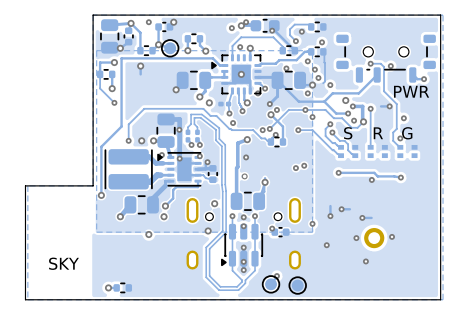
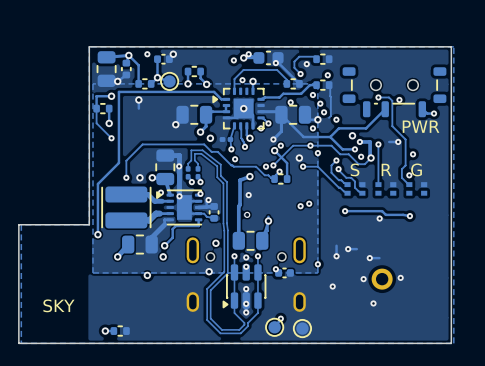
via: none -> (299, 158)

